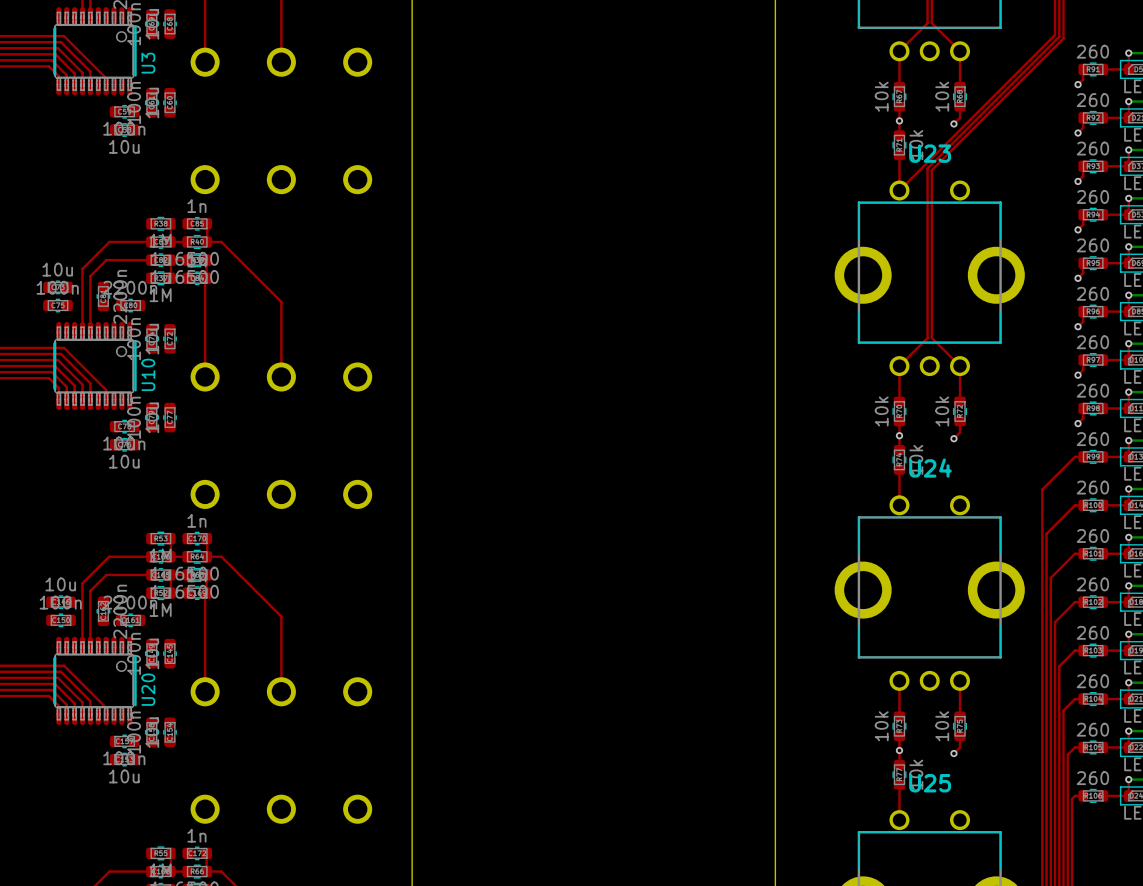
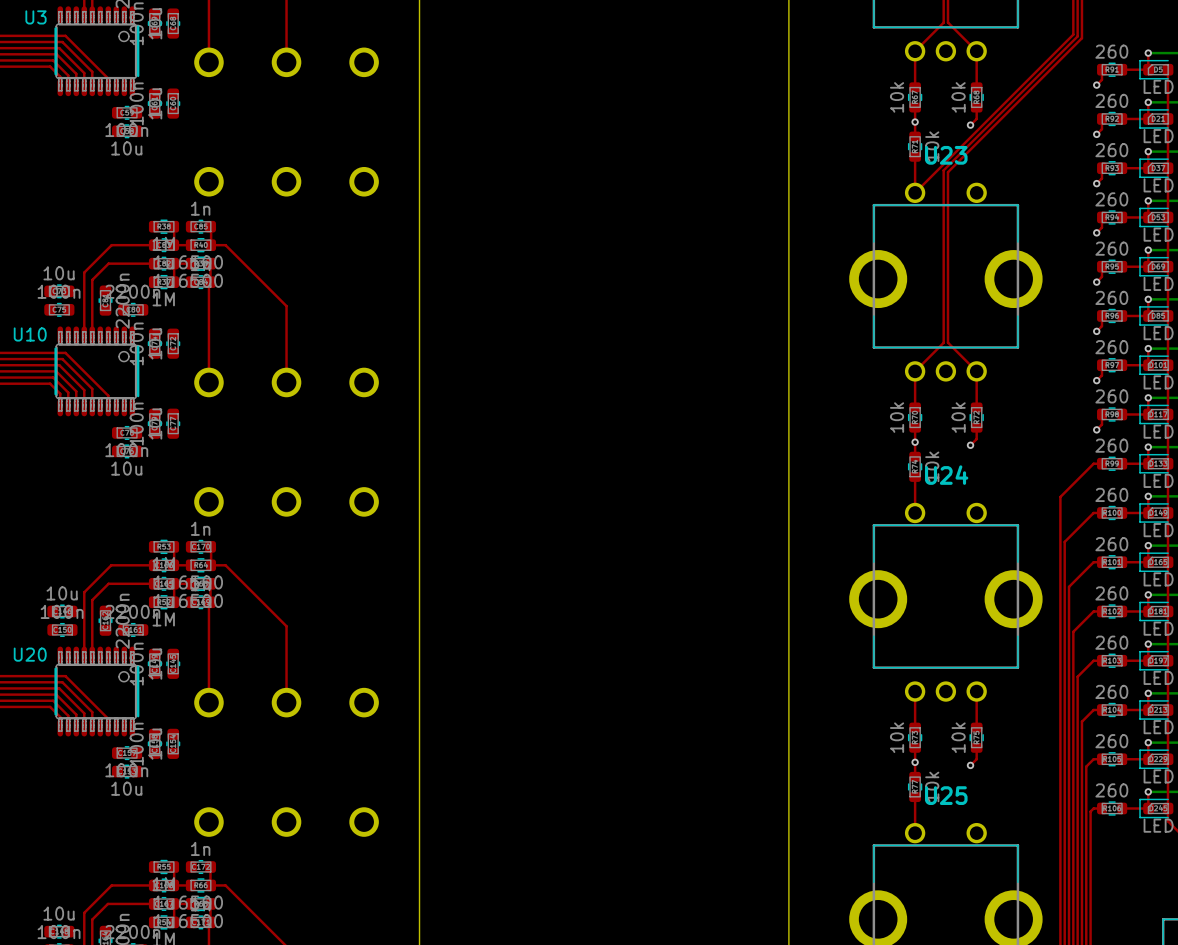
U3 name rotation: 0° (148, 63) -> 90° clockwise (36, 17)
U3 name position: U3 (148, 63) -> U3 (36, 17)
U10 name rotation: 0° (148, 374) -> 90° clockwise (30, 334)
U10 name position: U10 (148, 374) -> U10 (30, 334)
U20 name rotation: 0° (148, 689) -> 90° clockwise (30, 654)
U20 name position: U20 (148, 689) -> U20 (30, 654)

